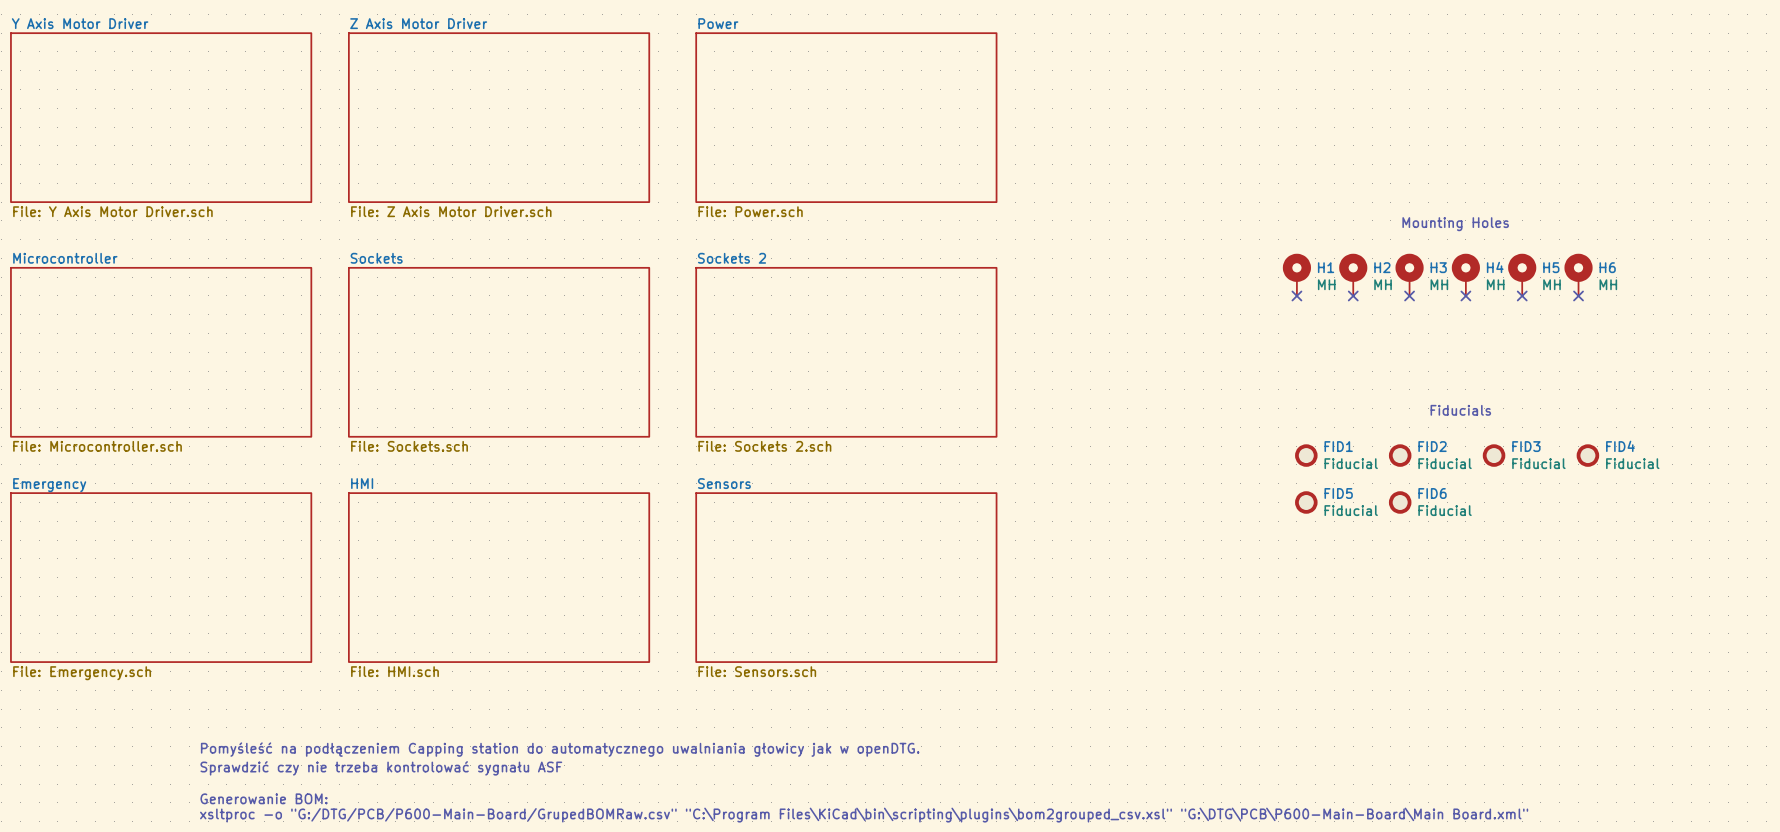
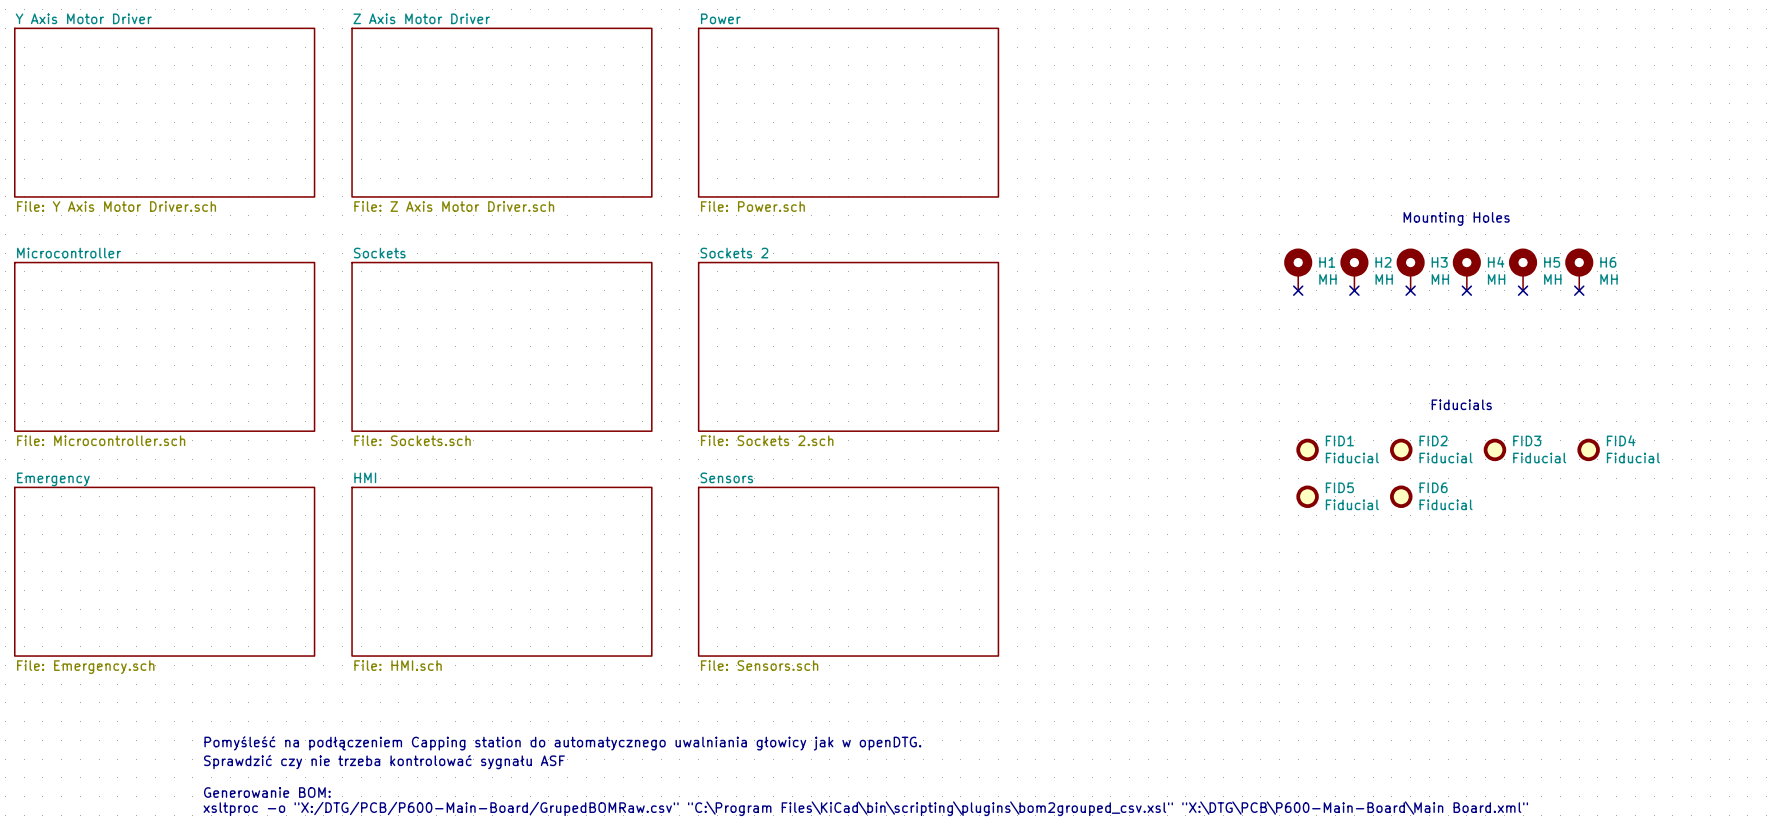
text: xsltproc -o "G:/DTG/PCB/P600-Main-Board/GrupedBOMRaw.csv" "C:\Program Files\KiCad\bin\scripting\plugins\bom2grouped_csv.xsl" "G:\DTG\PCB\P600-Main-Board\Main Board.xml" (864, 815) -> xsltproc -o "X:/DTG/PCB/P600-Main-Board/GrupedBOMRaw.csv" "C:\Program Files\KiCad\bin\scripting\plugins\bom2grouped_csv.xsl" "X:\DTG\PCB\P600-Main-Board\Main Board.xml" (865, 808)

